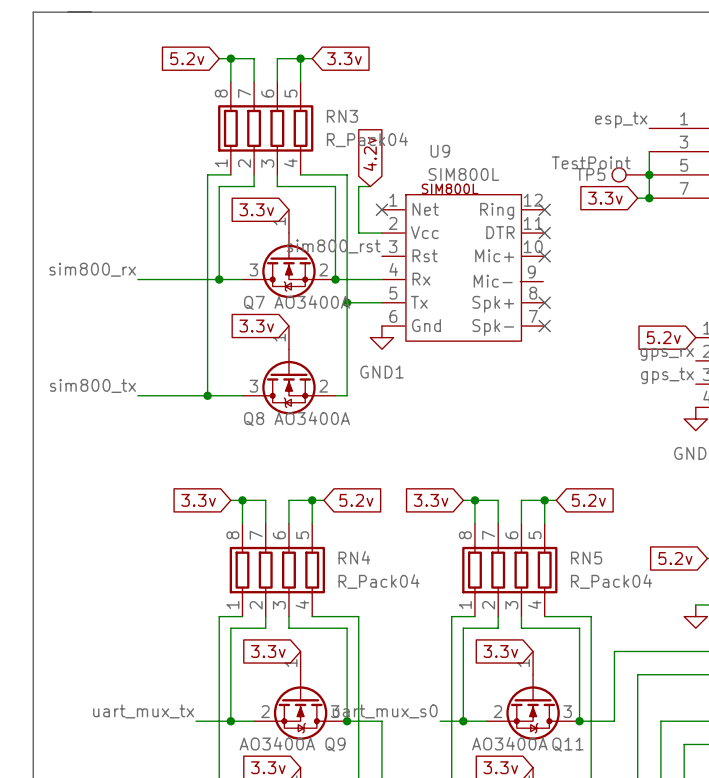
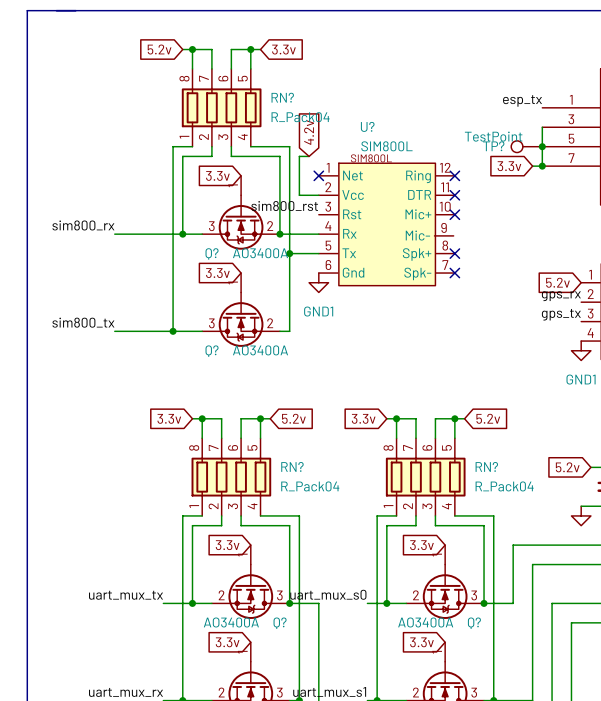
RN3 name: RN3 (342, 116) -> RN? (282, 97)
U9 name: U9 (440, 151) -> U? (367, 126)
TP5 name: TP5 (590, 174) -> TP? (493, 146)
Q7 name: Q7 (254, 302) -> Q? (212, 253)
Q8 name: Q8 (254, 419) -> Q? (212, 351)
RN4 name: RN4 (354, 557) -> RN? (292, 466)
RN5 name: RN5 (586, 558) -> RN? (486, 466)
Q9 name: Q9 (335, 744) -> Q? (280, 623)
Q11 name: Q11 (567, 744) -> Q? (474, 623)

